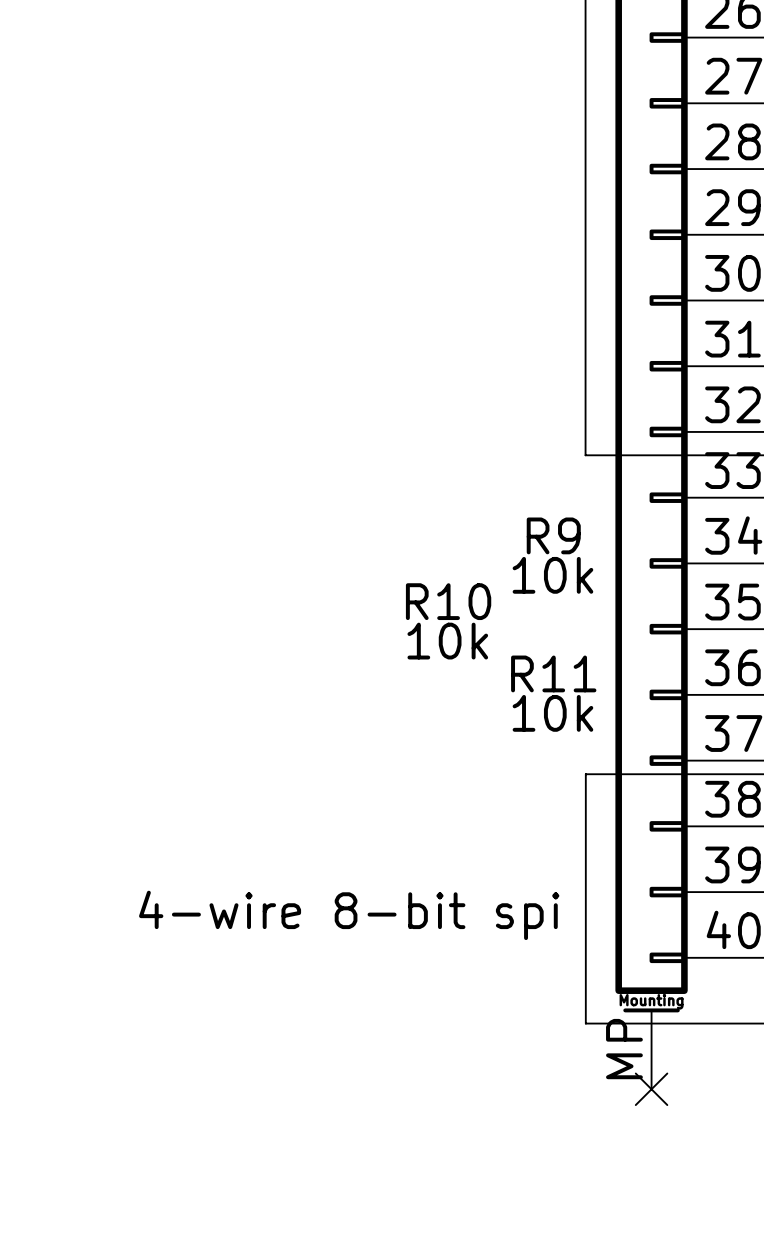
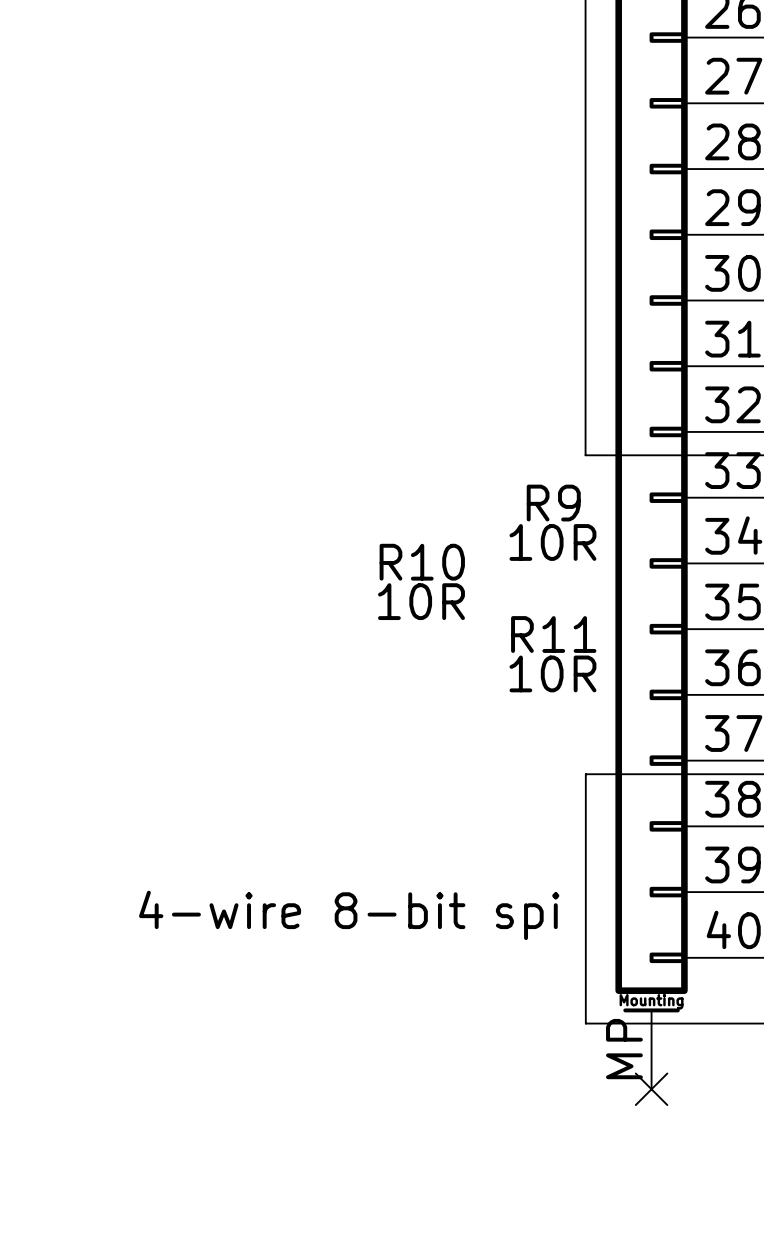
R9 name position: R9 (553, 535) -> R9 (553, 503)
R9 value: 10k (552, 575) -> 10R (552, 542)
R10 name position: R10 (448, 601) -> R10 (422, 562)
R10 value: 10k (447, 641) -> 10R (421, 601)
R11 name position: R11 (553, 673) -> R11 (553, 634)
R11 value: 10k (552, 713) -> 10R (552, 673)

